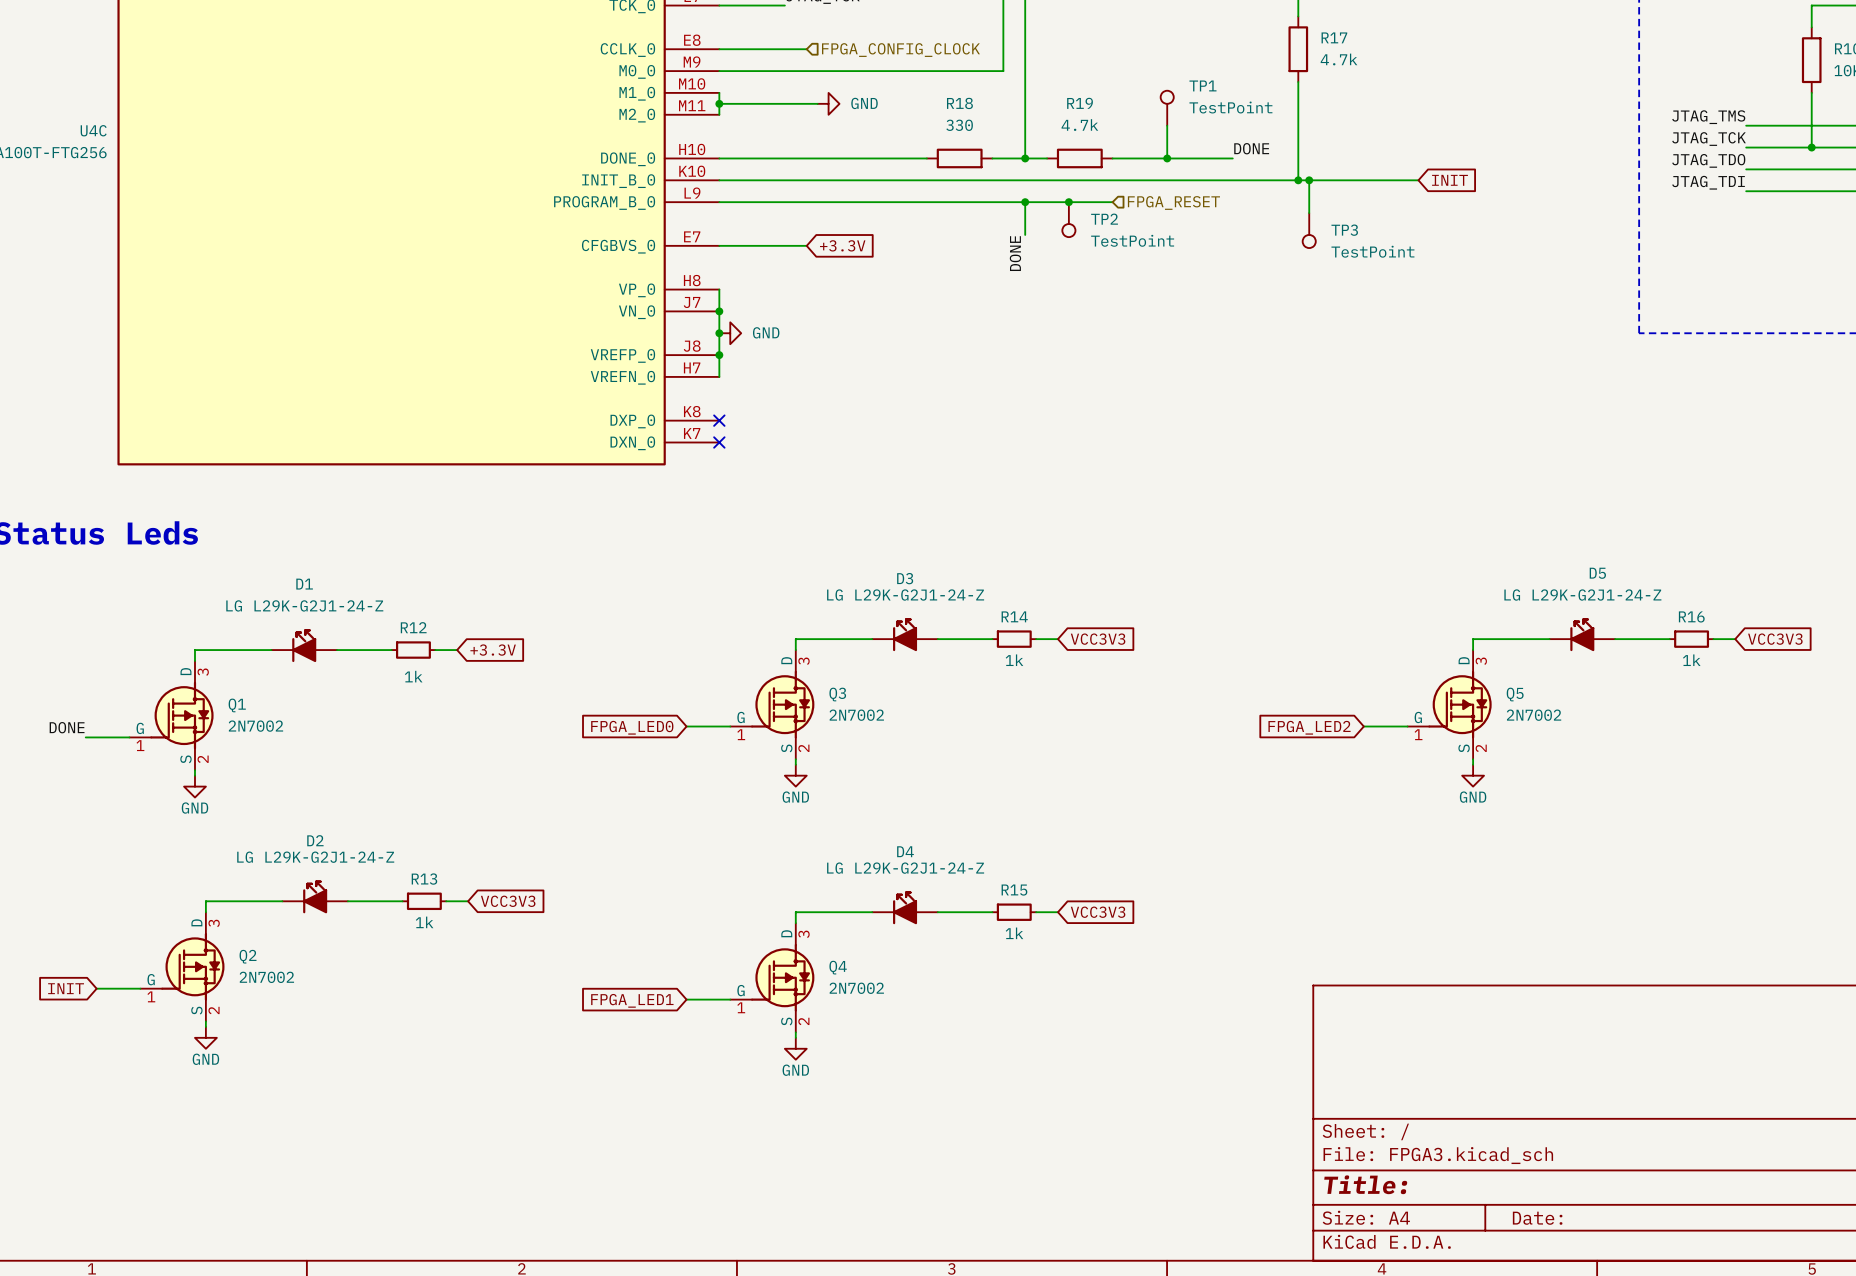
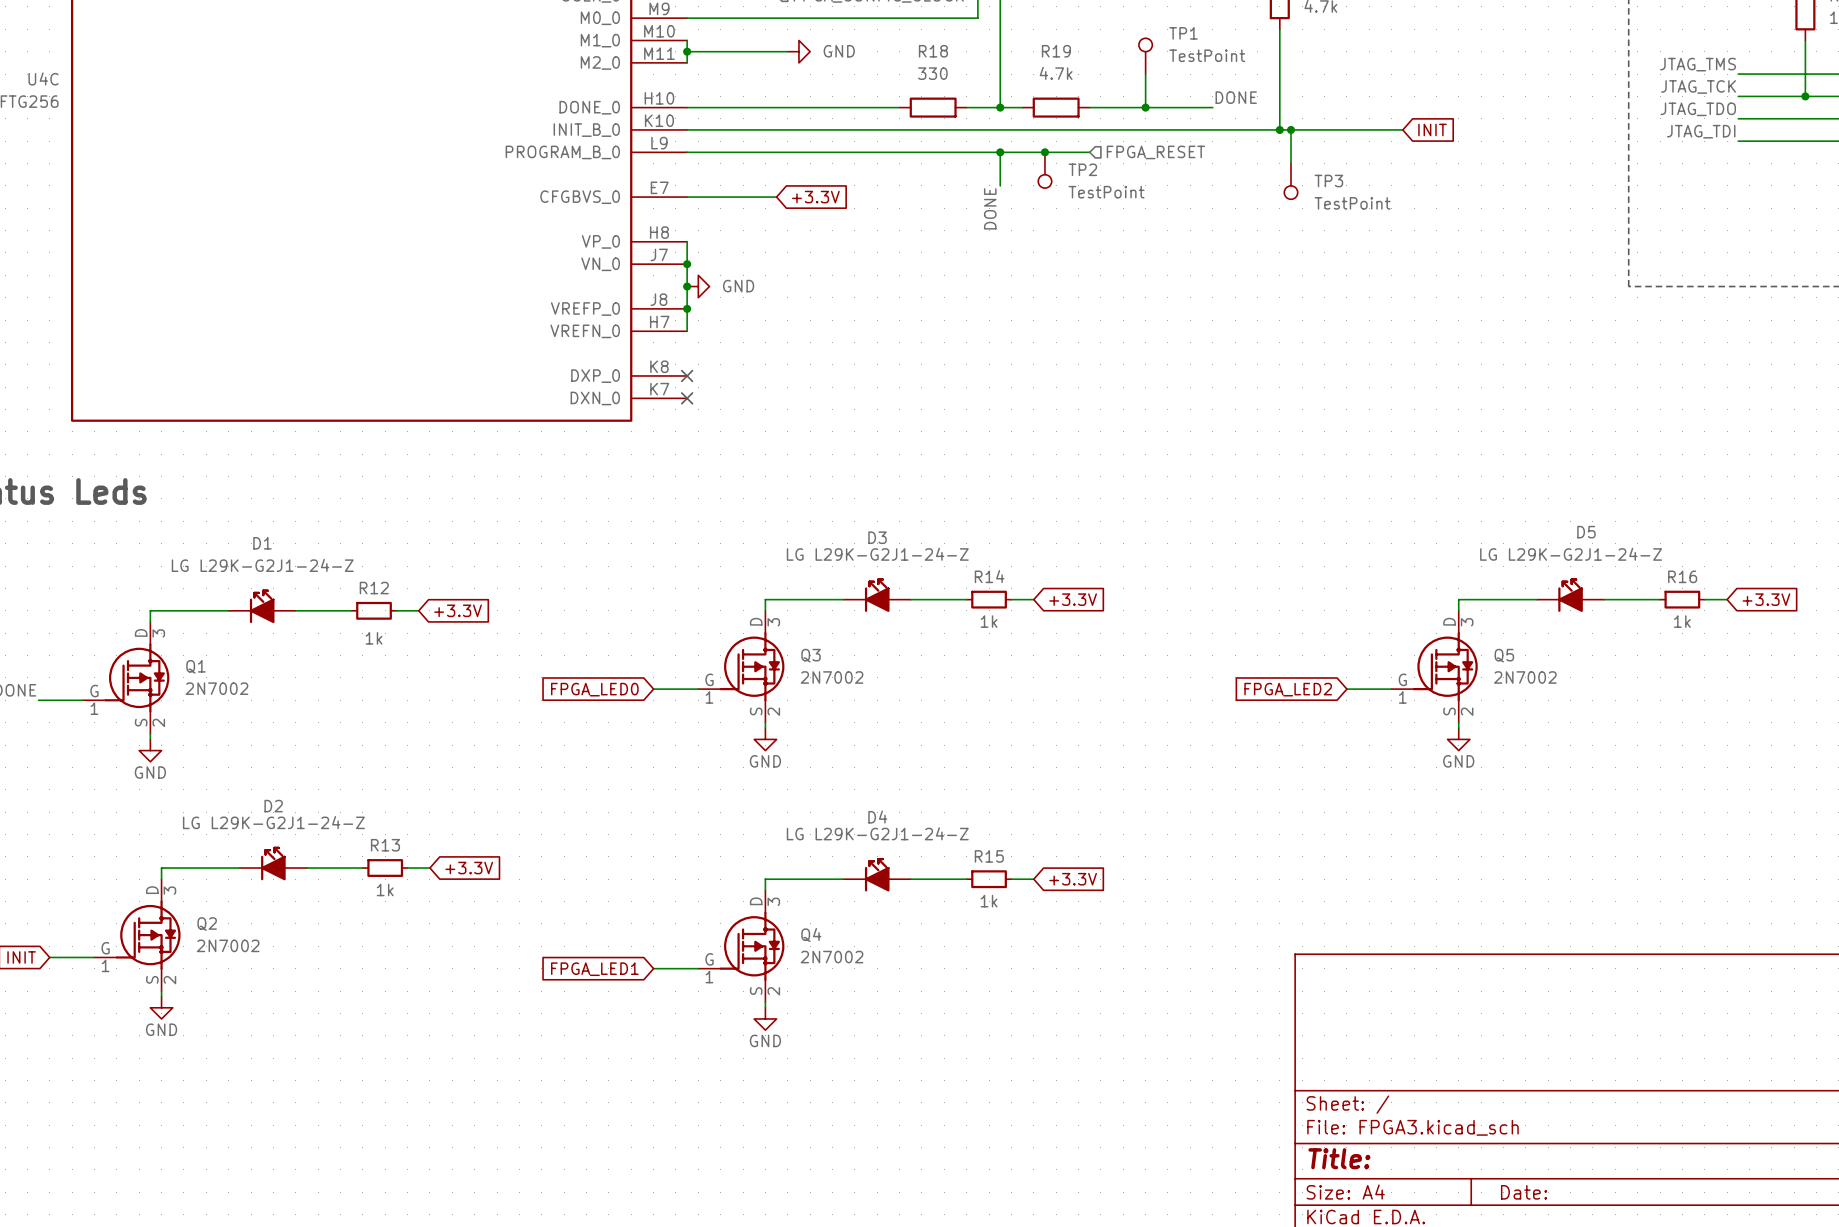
global label: VCC3V3 (1098, 639) -> +3.3V (1073, 599)
global label: VCC3V3 (1775, 639) -> +3.3V (1766, 599)
global label: VCC3V3 (508, 901) -> +3.3V (469, 868)
global label: VCC3V3 (1098, 912) -> +3.3V (1073, 879)

